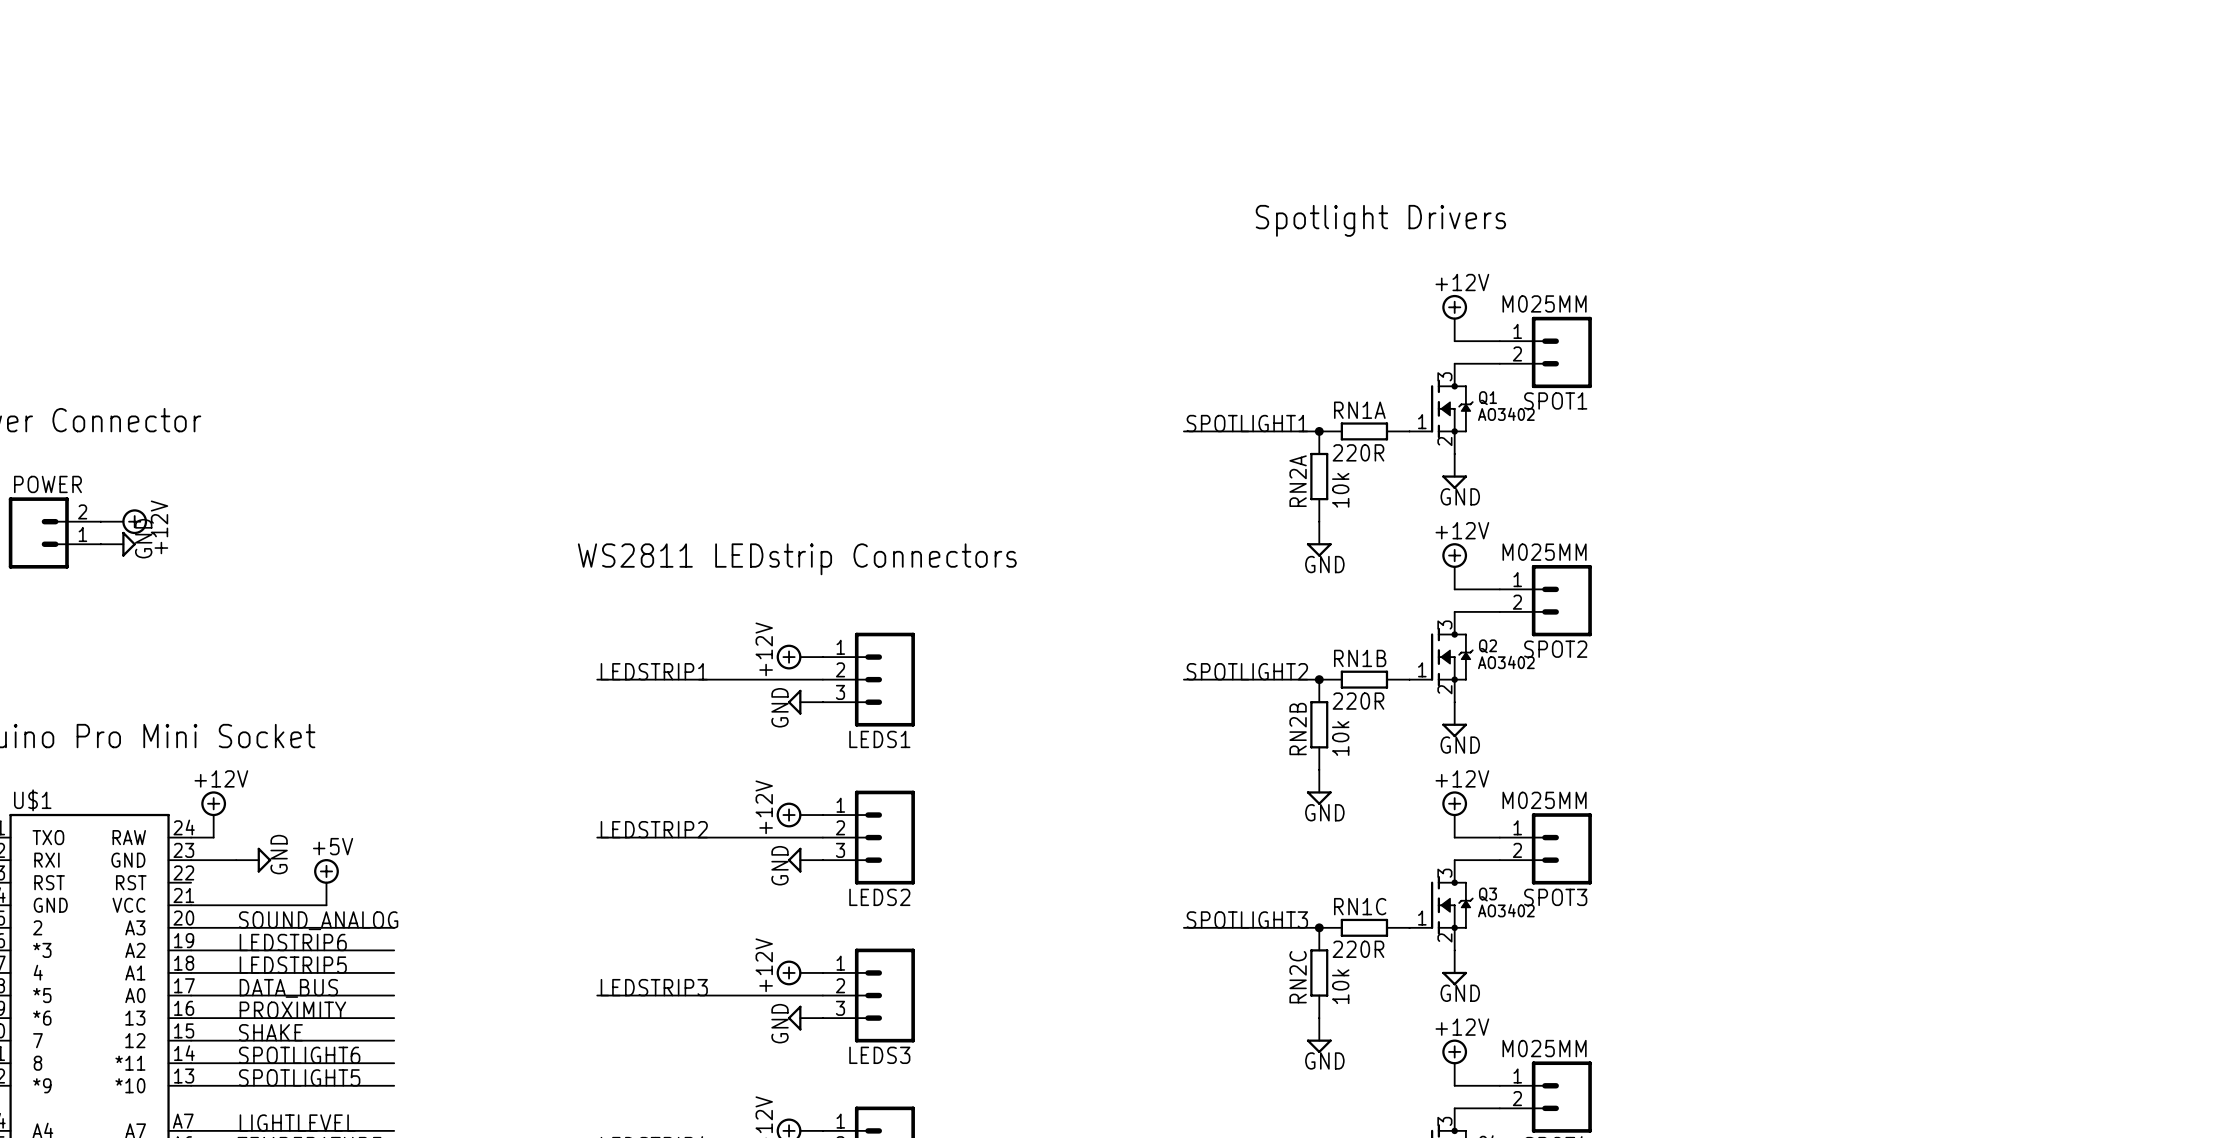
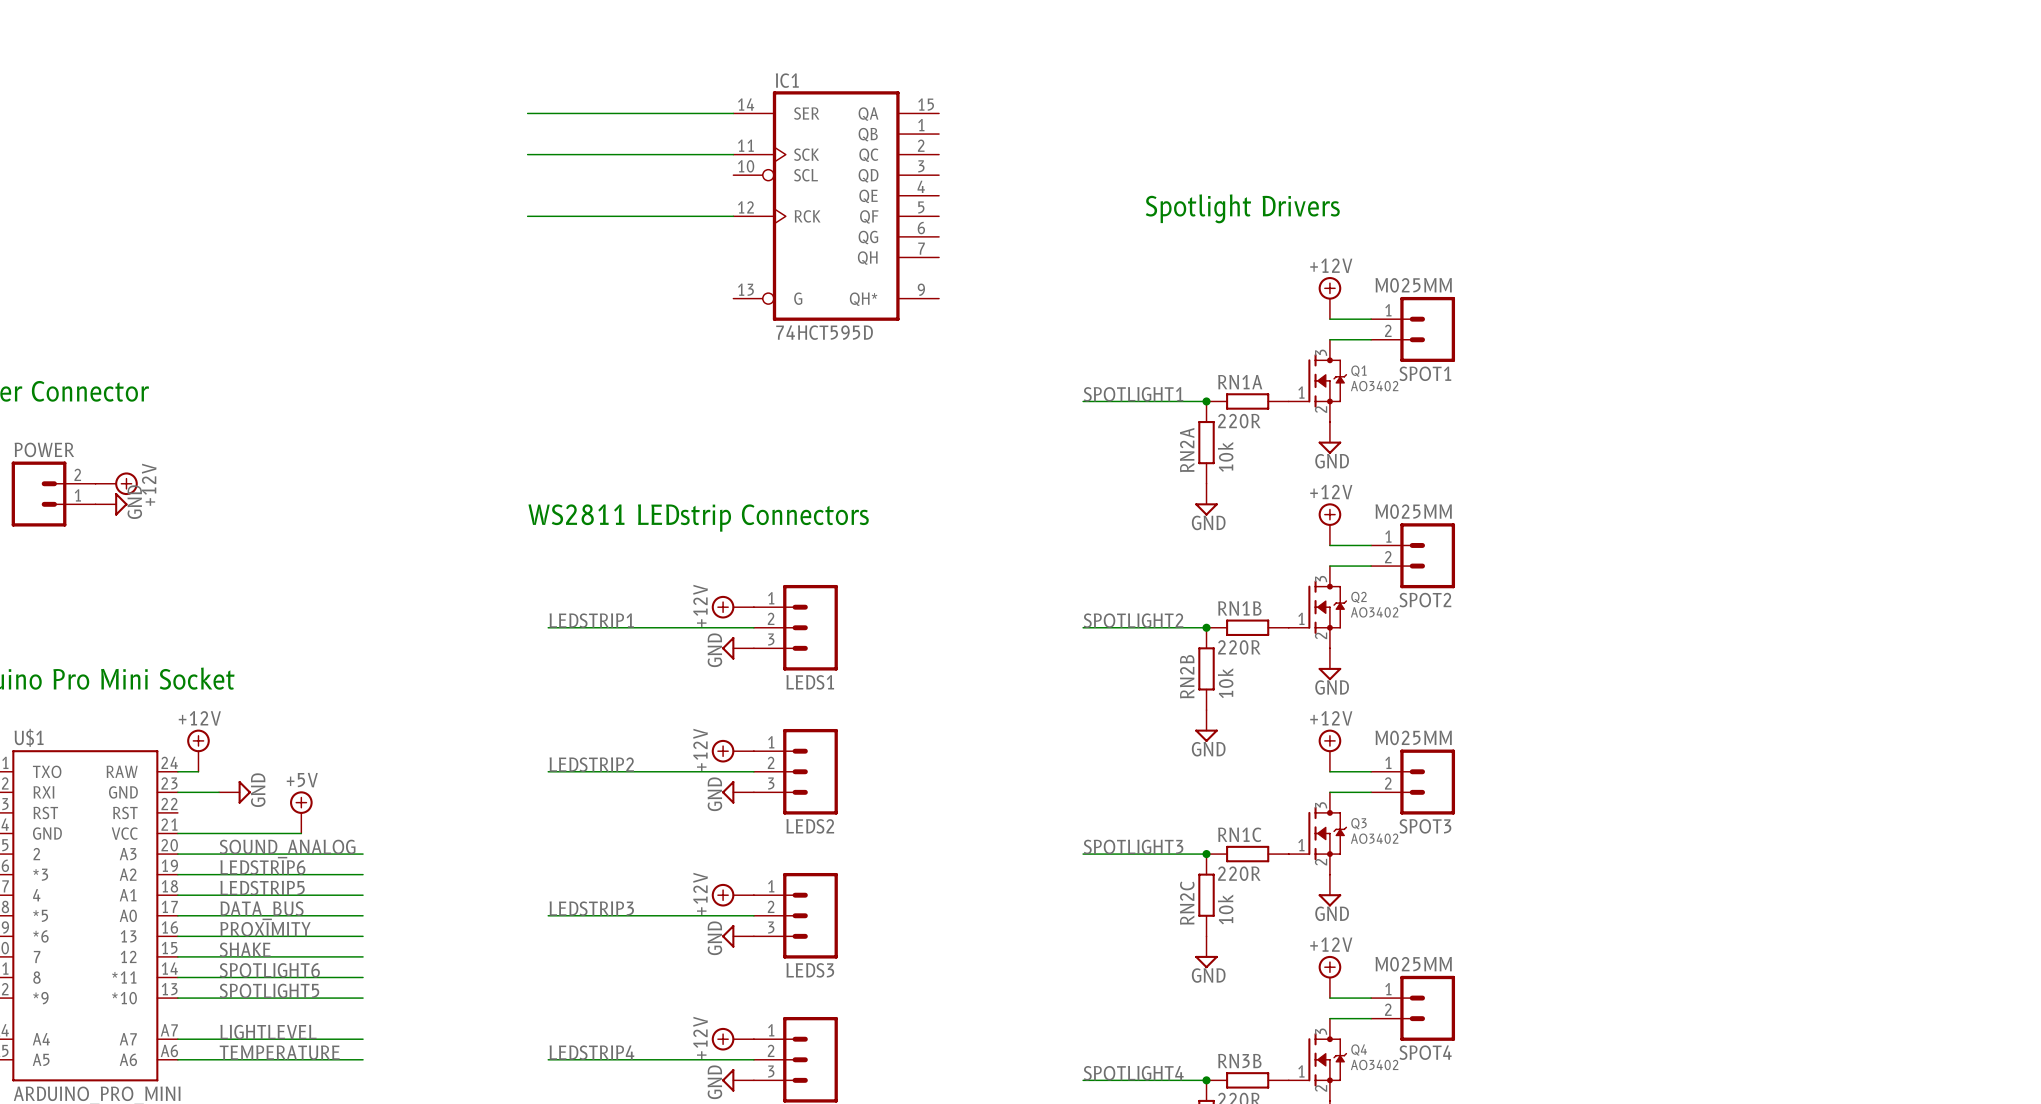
wire: none -> (527, 113) (733, 113)
wire: none -> (527, 154) (733, 154)
IC1: none -> 74HCT595D (836, 206)
wire: none -> (527, 216) (733, 216)

